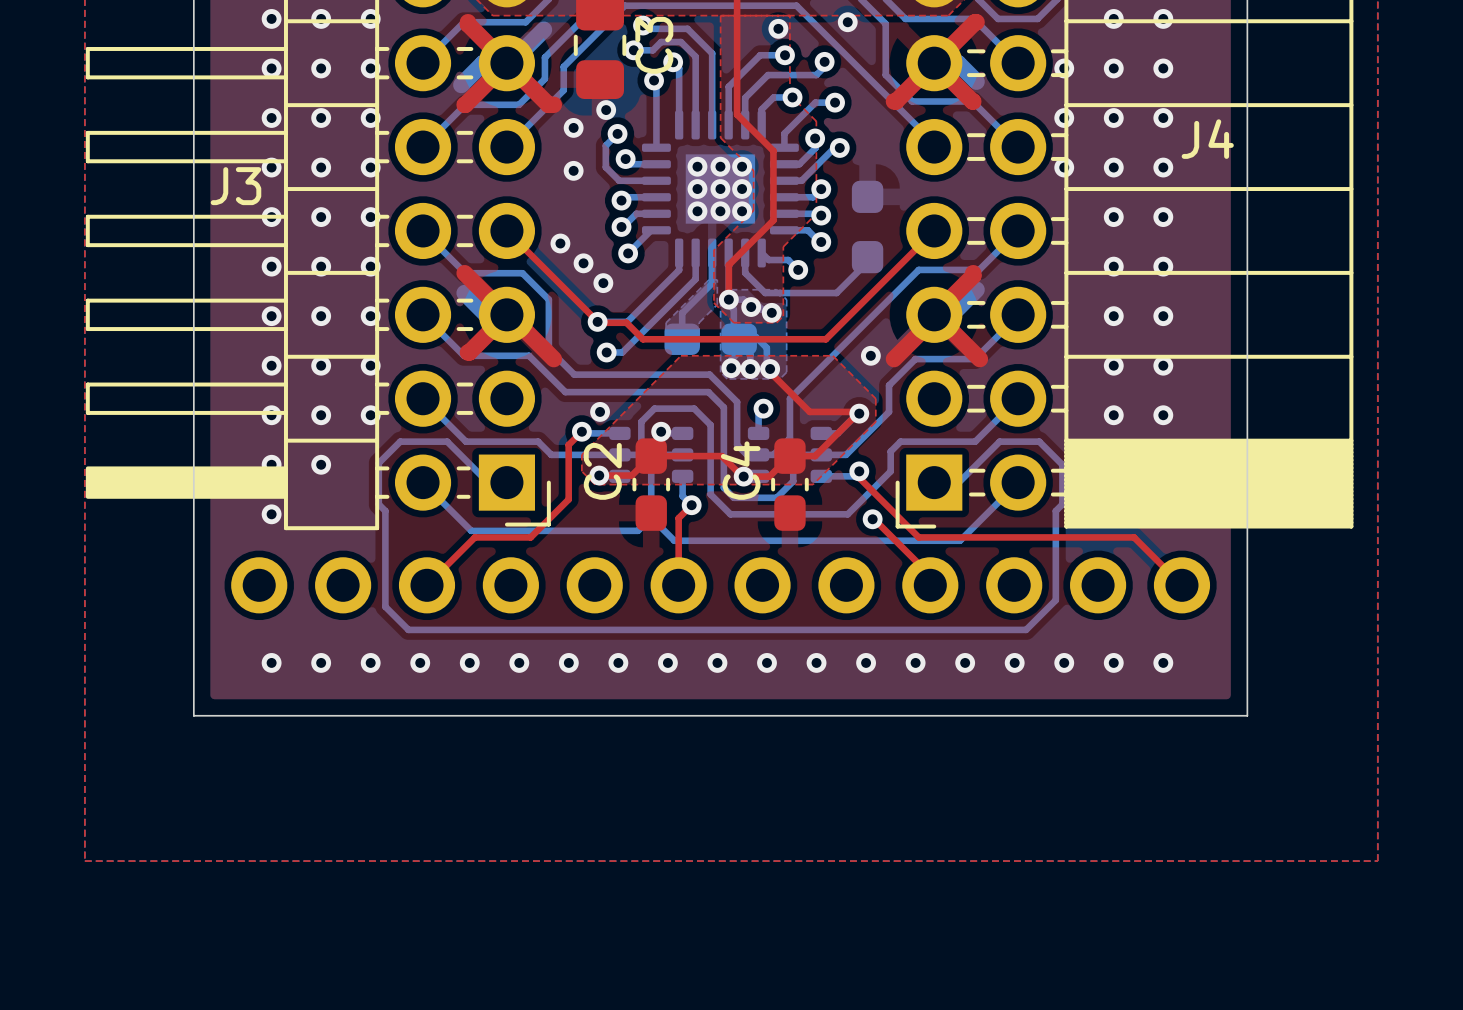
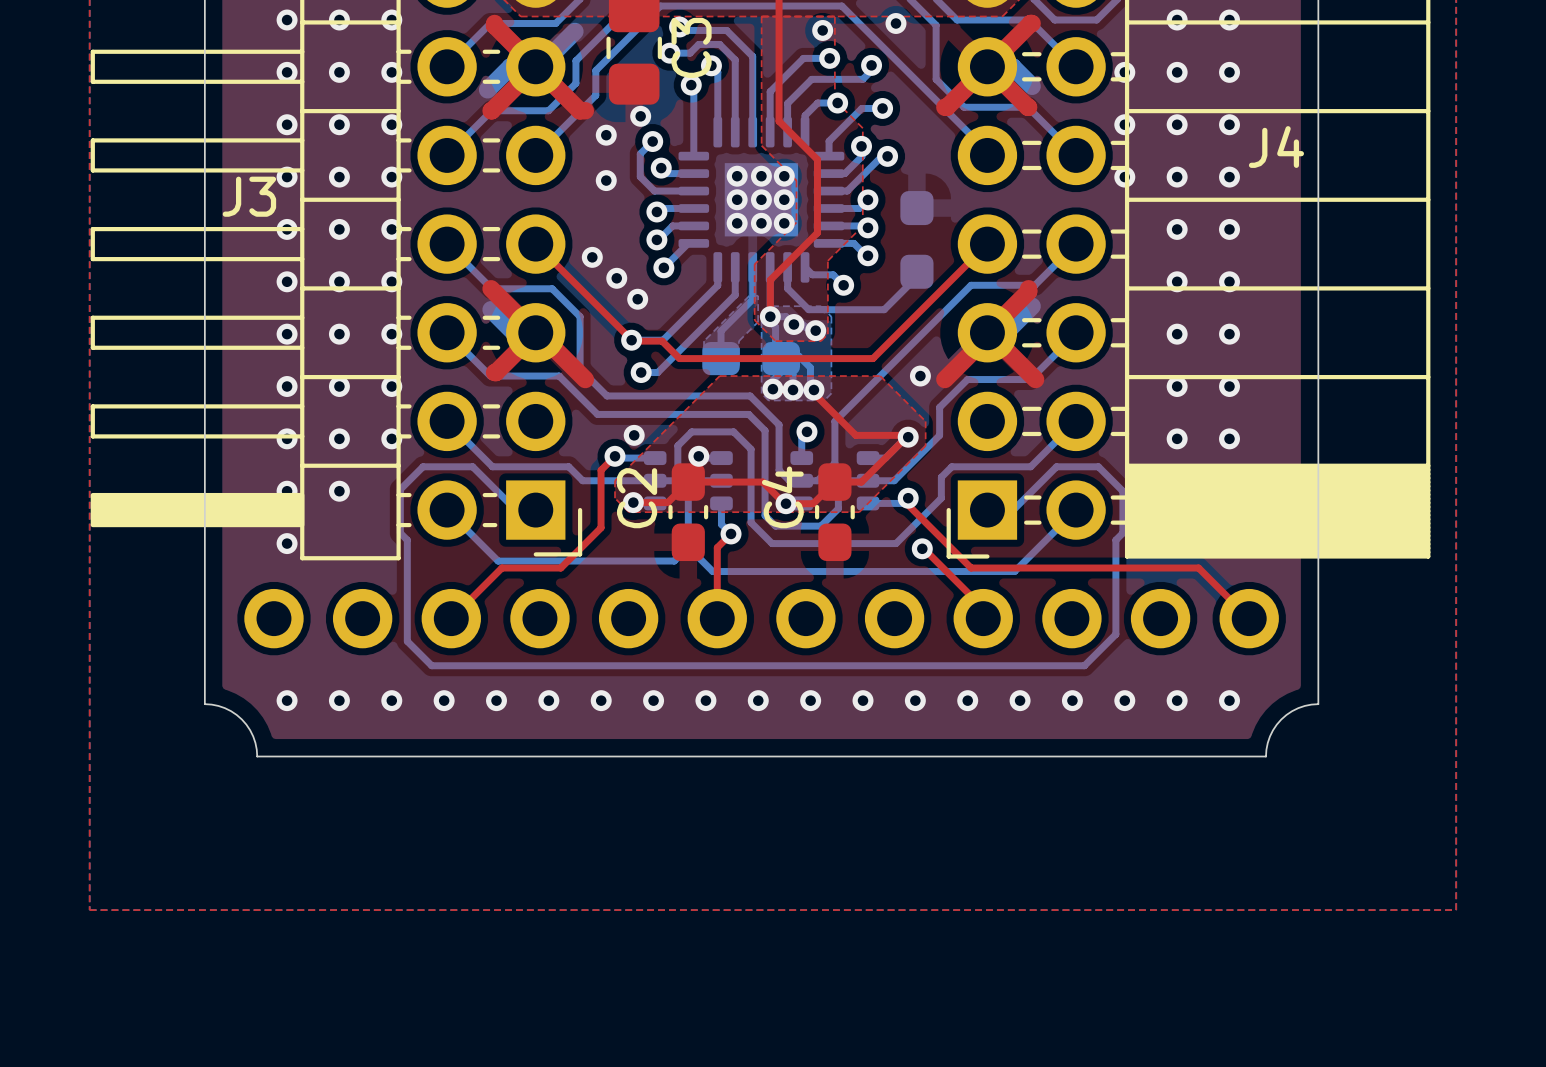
board edge: (193, 666) (193, 715) (243, 715) -> (204, 704) (224, 708) (241, 719) (253, 736) (257, 756)
board edge: (1247, 666) (1247, 715) (1197, 715) -> (1318, 704) (1298, 708) (1281, 719) (1269, 736) (1265, 756)

